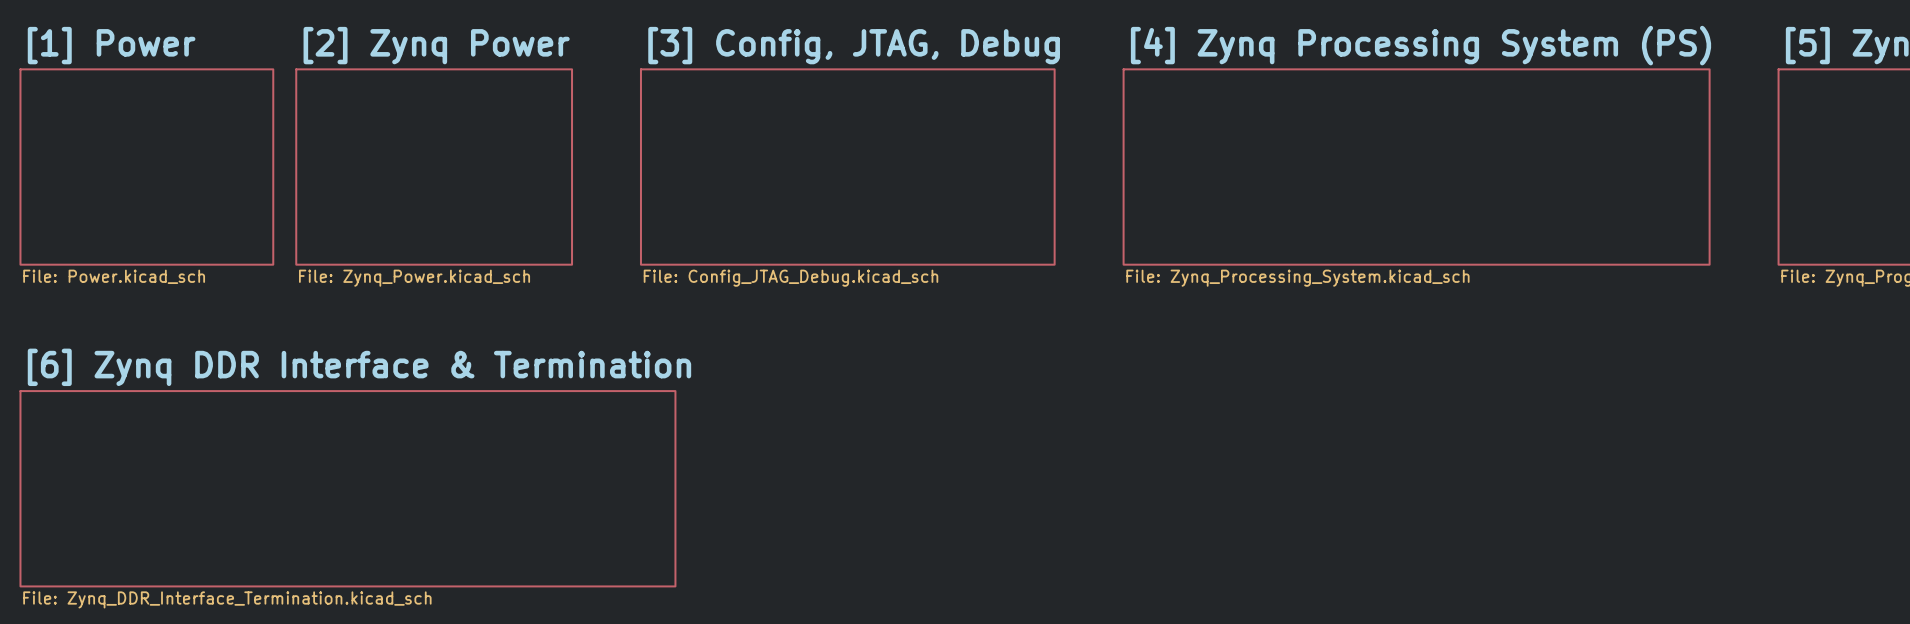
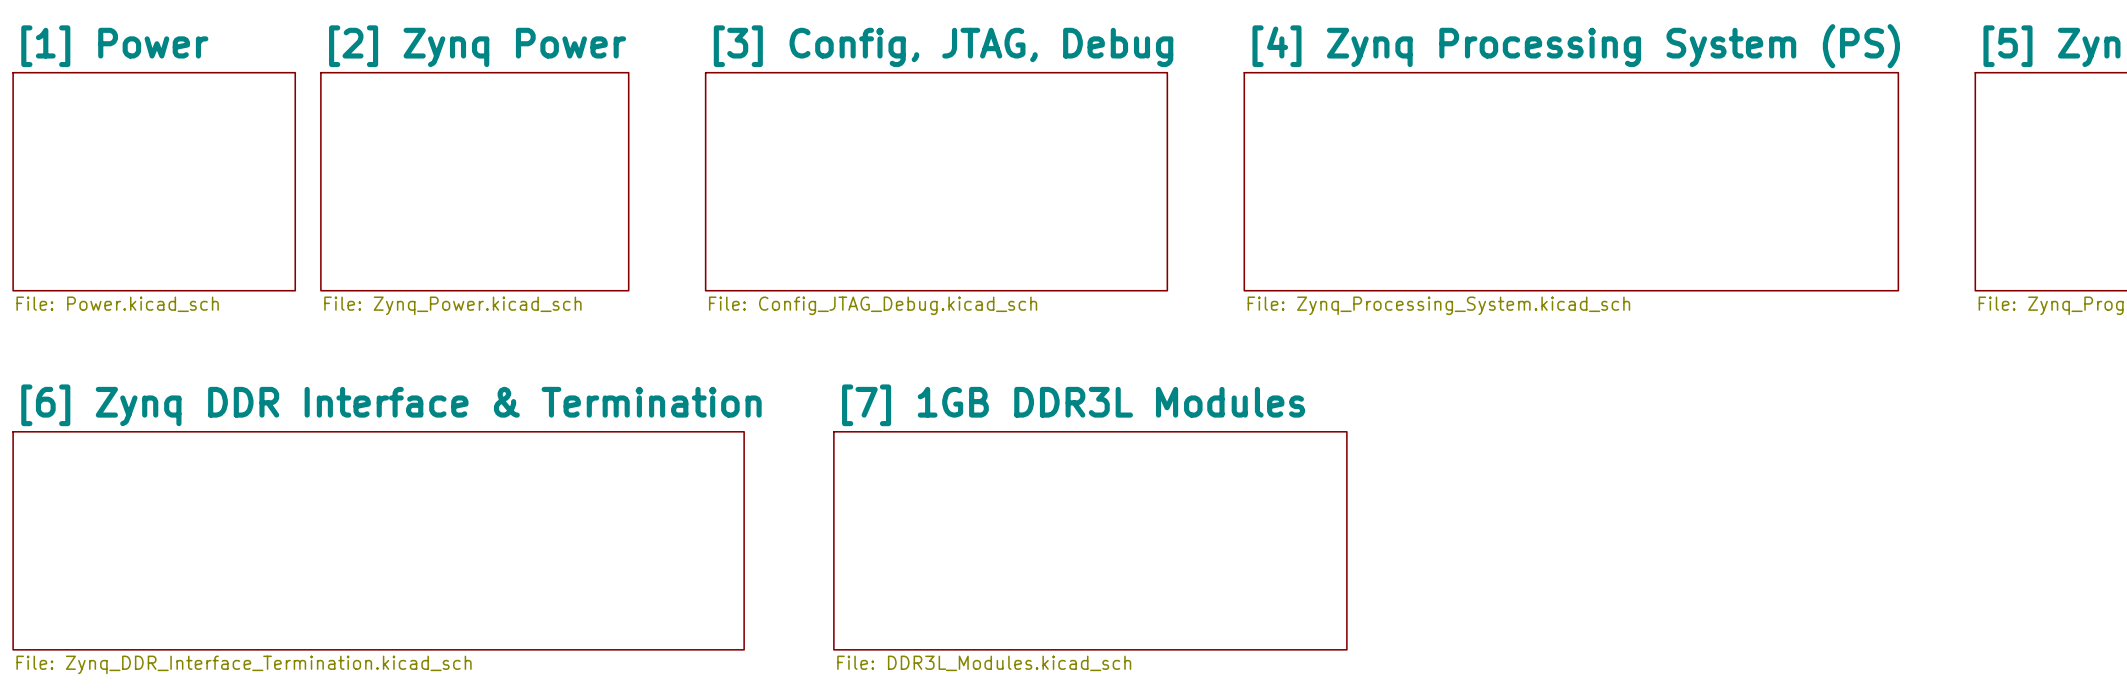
sheet [7] 1GB DDR3L Modules: none -> File: DDR3L_Modules.kicad_sch (1090, 540)

